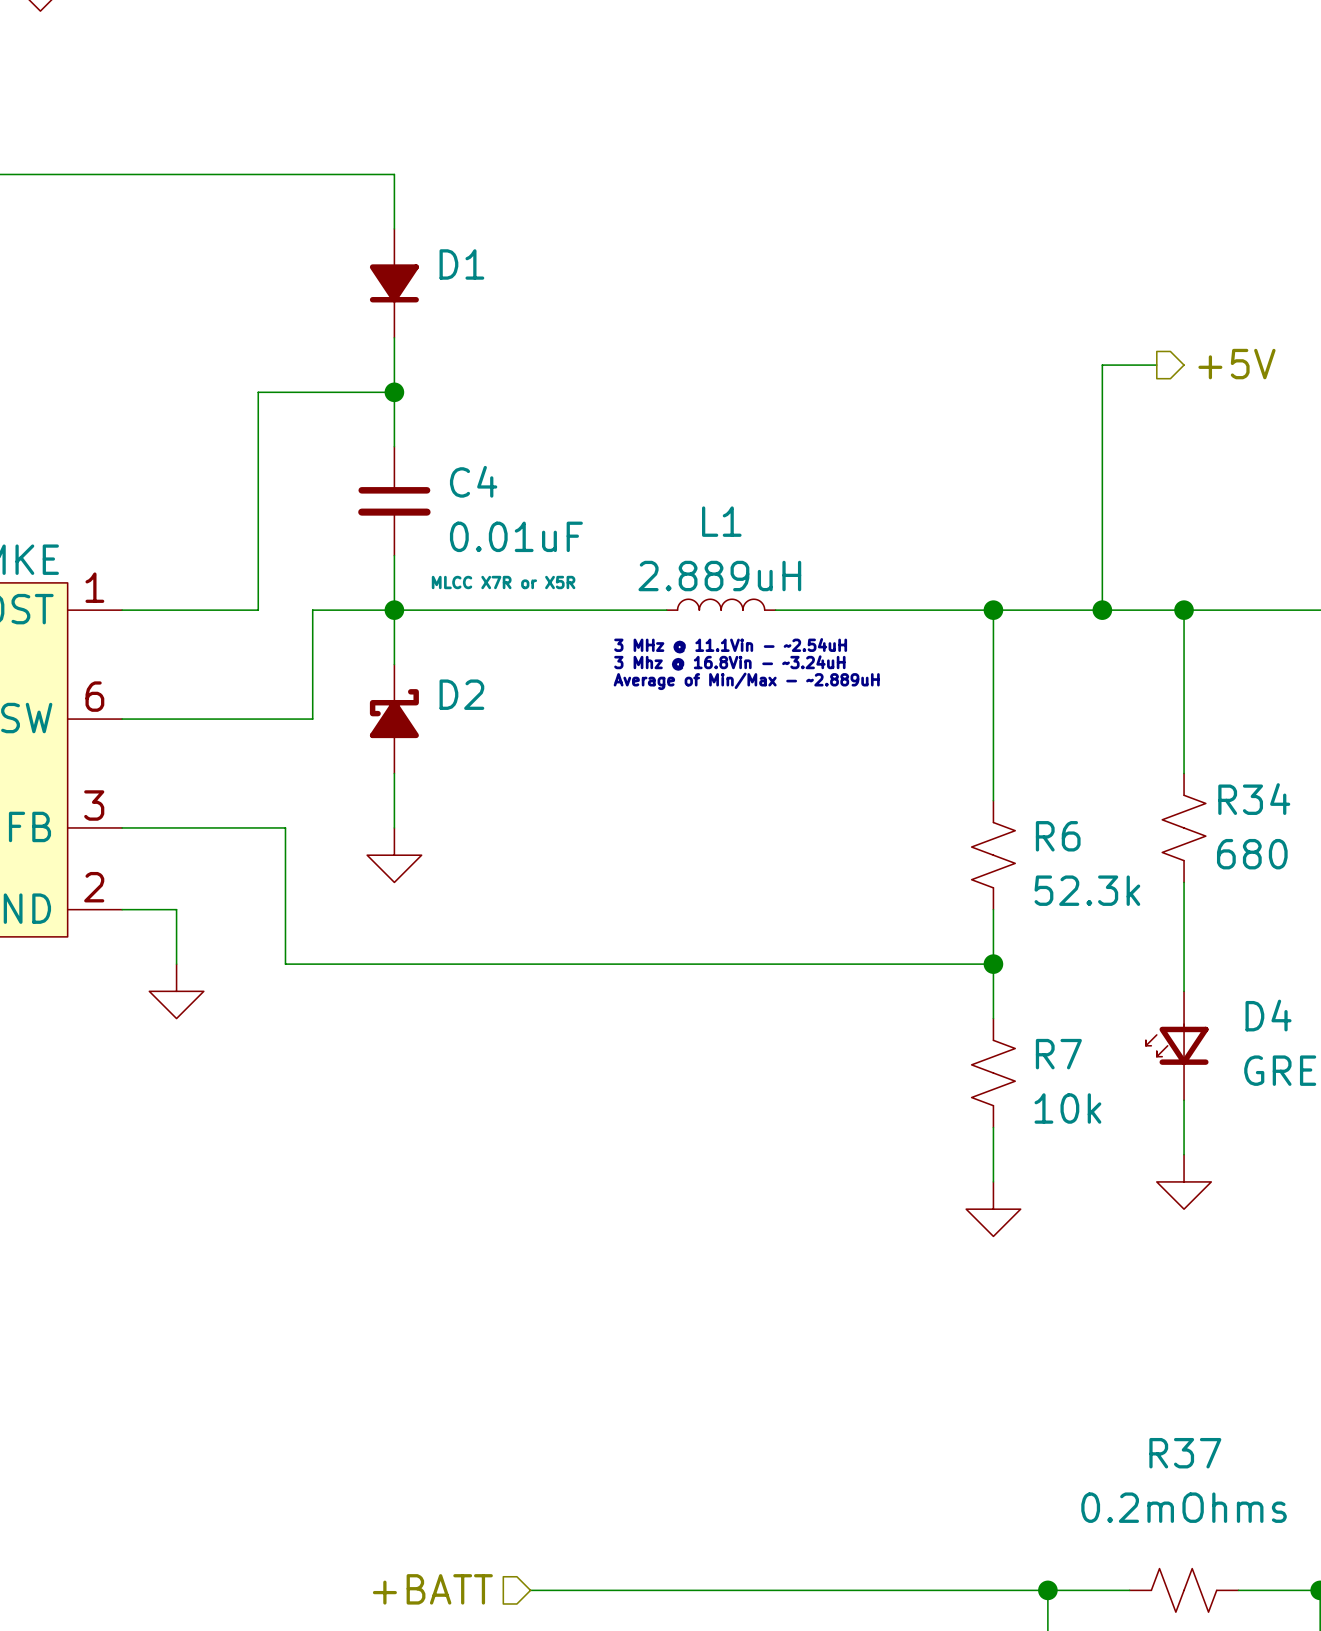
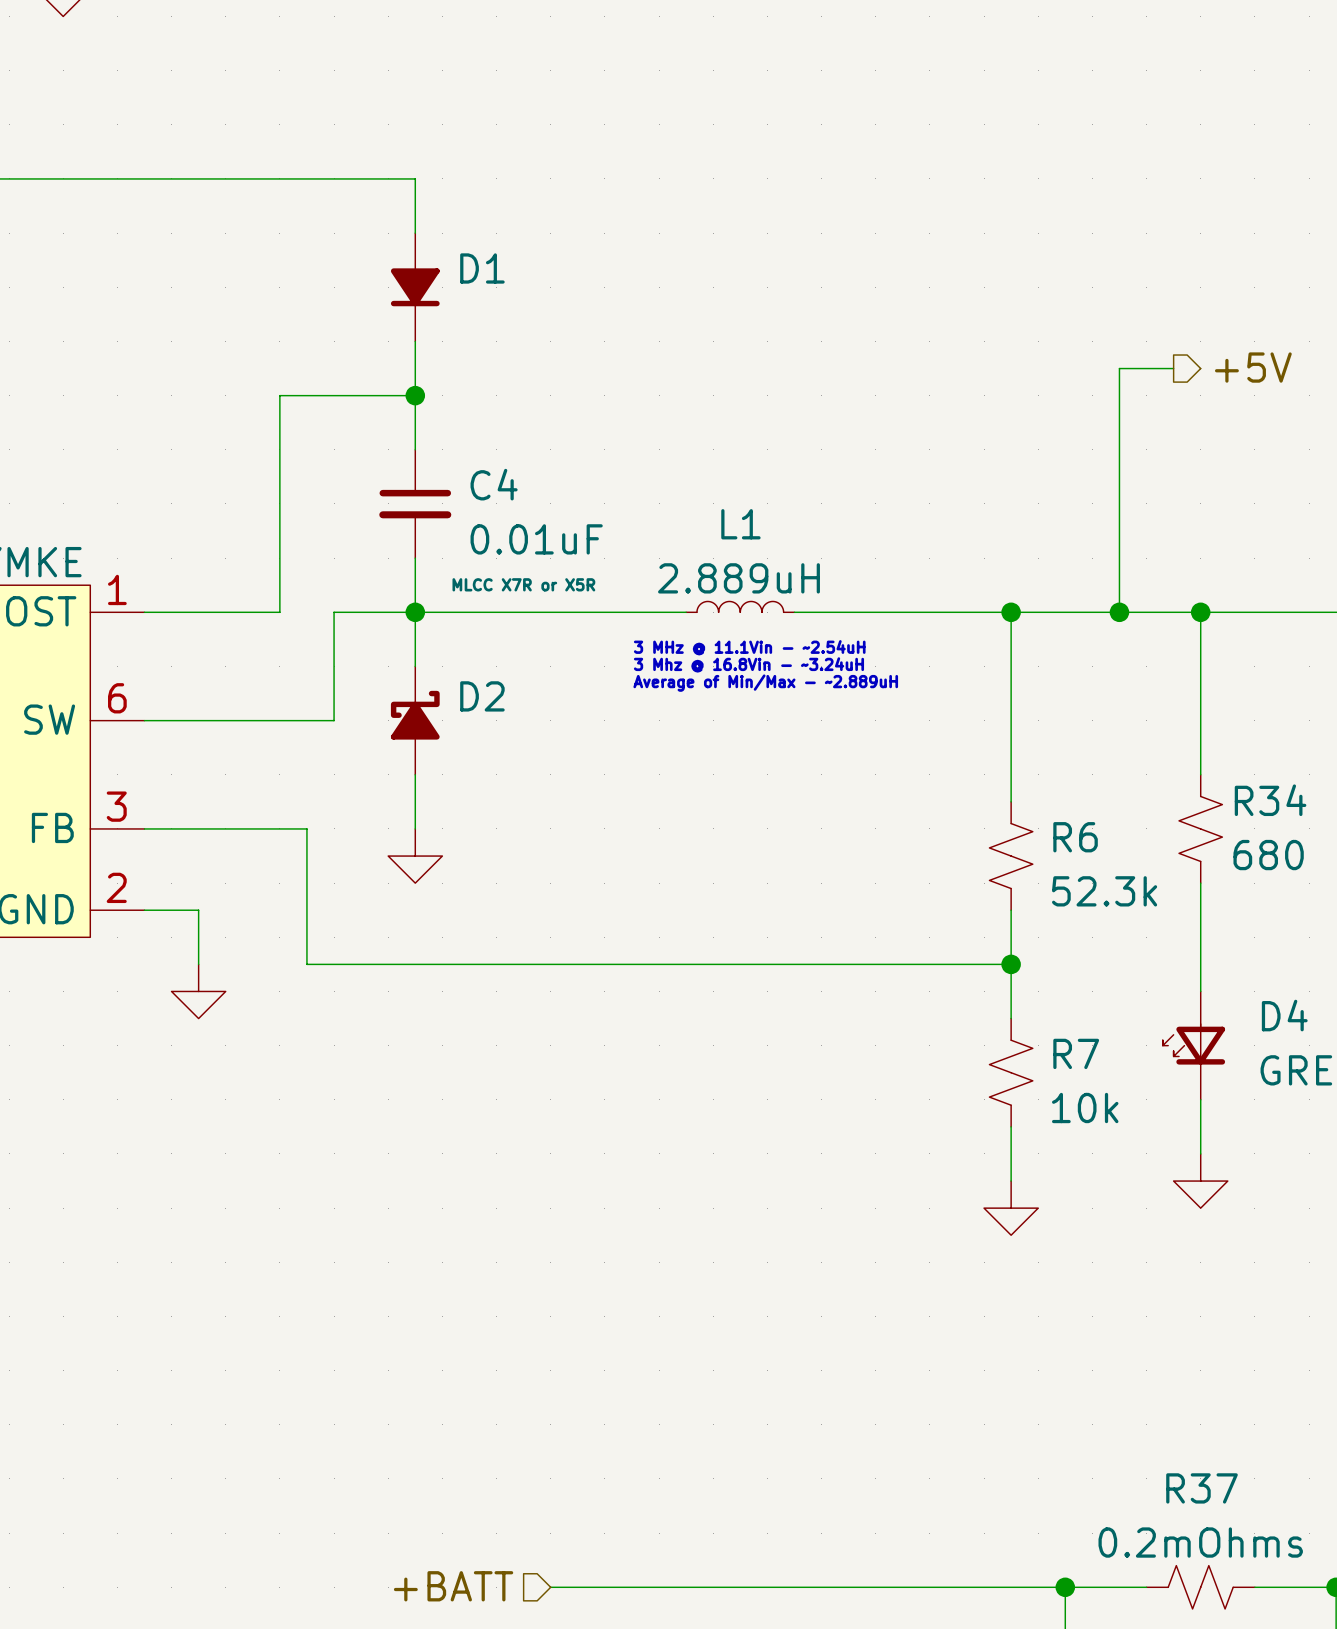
R37 name position: R37 (1185, 1453) -> R37 (1202, 1488)
R37 value position: 0.2mOhms (1184, 1507) -> 0.2mOhms (1200, 1542)

